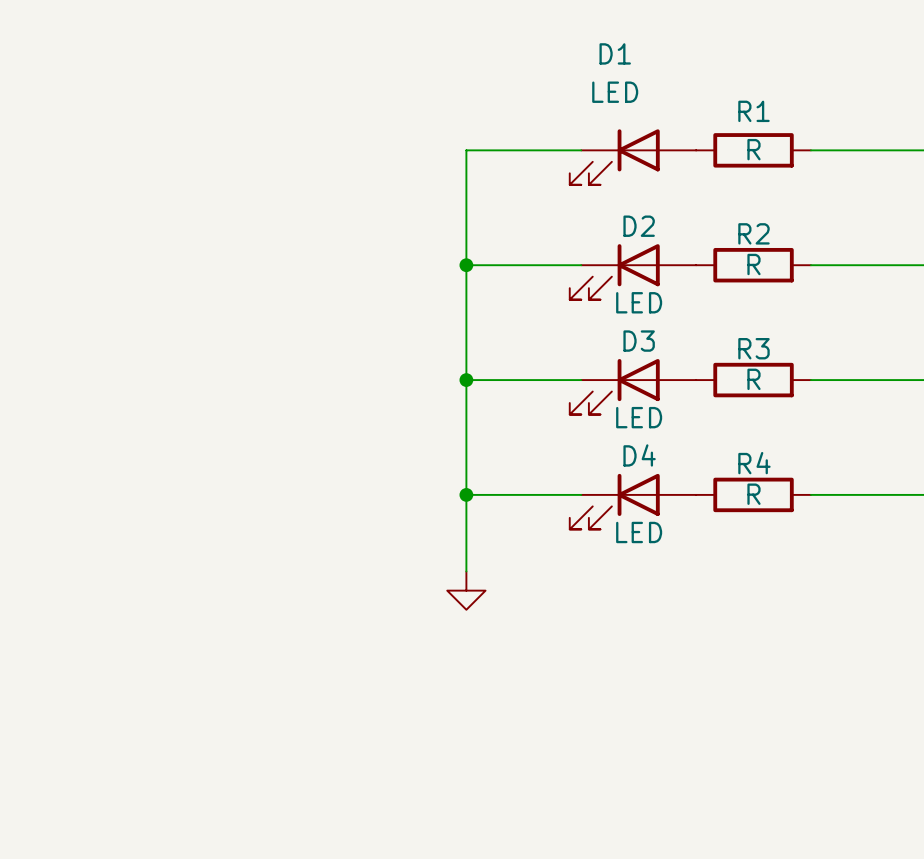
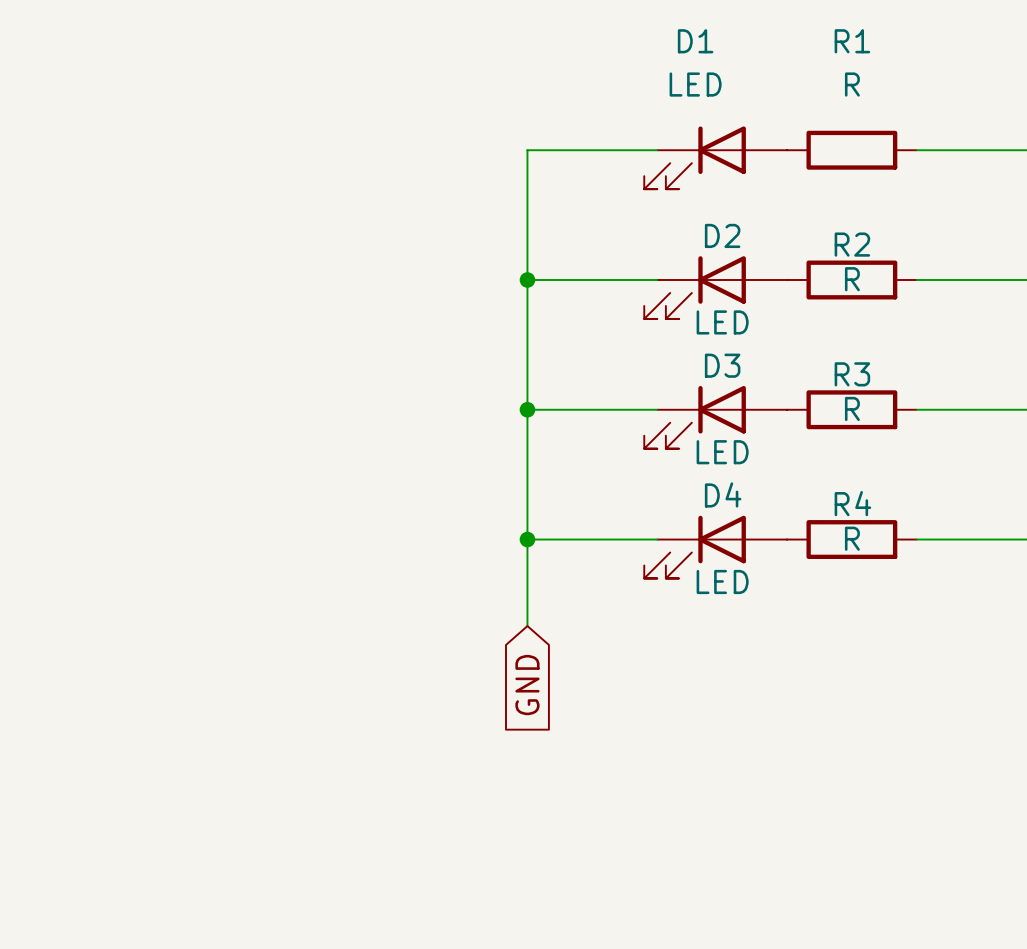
R1 name position: R1 (753, 111) -> R1 (852, 41)
R1 value position: R (753, 149) -> R (852, 84)
power symbol: (466, 590) -> none
global label: none -> GND (527, 685)

